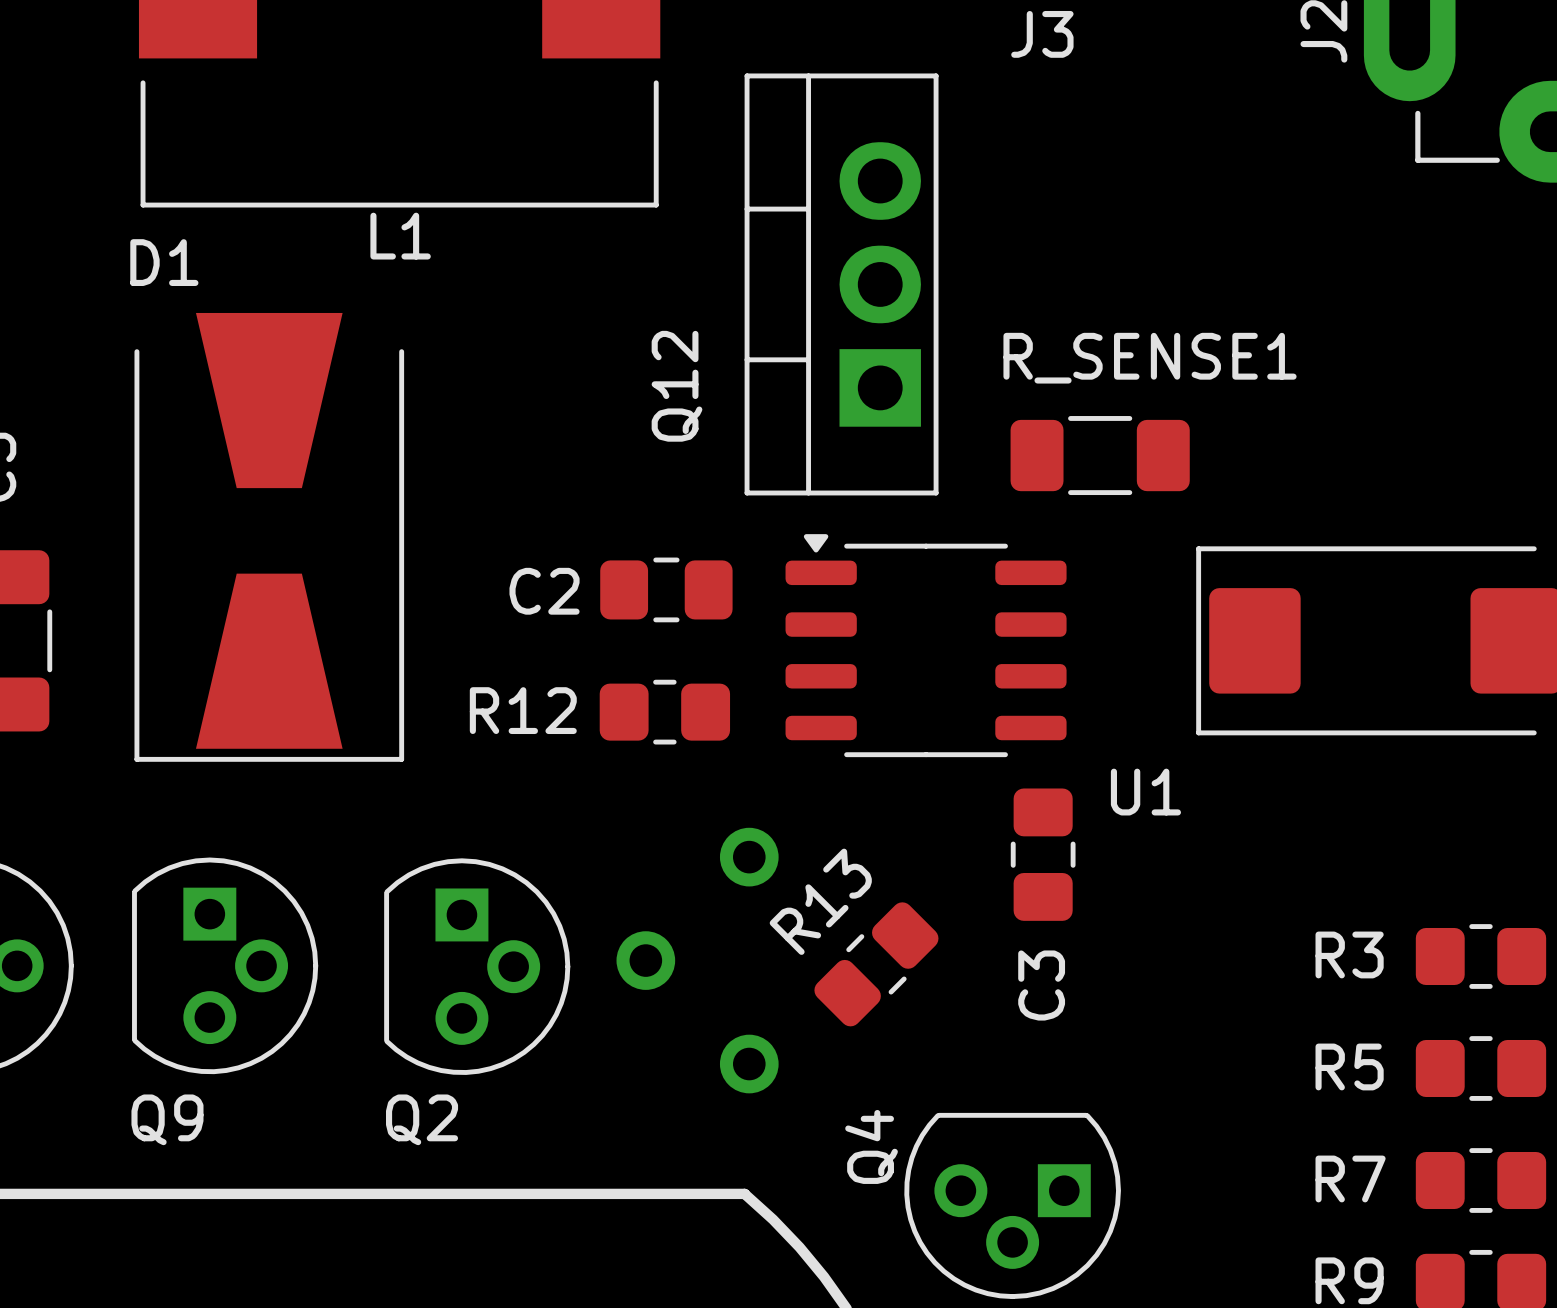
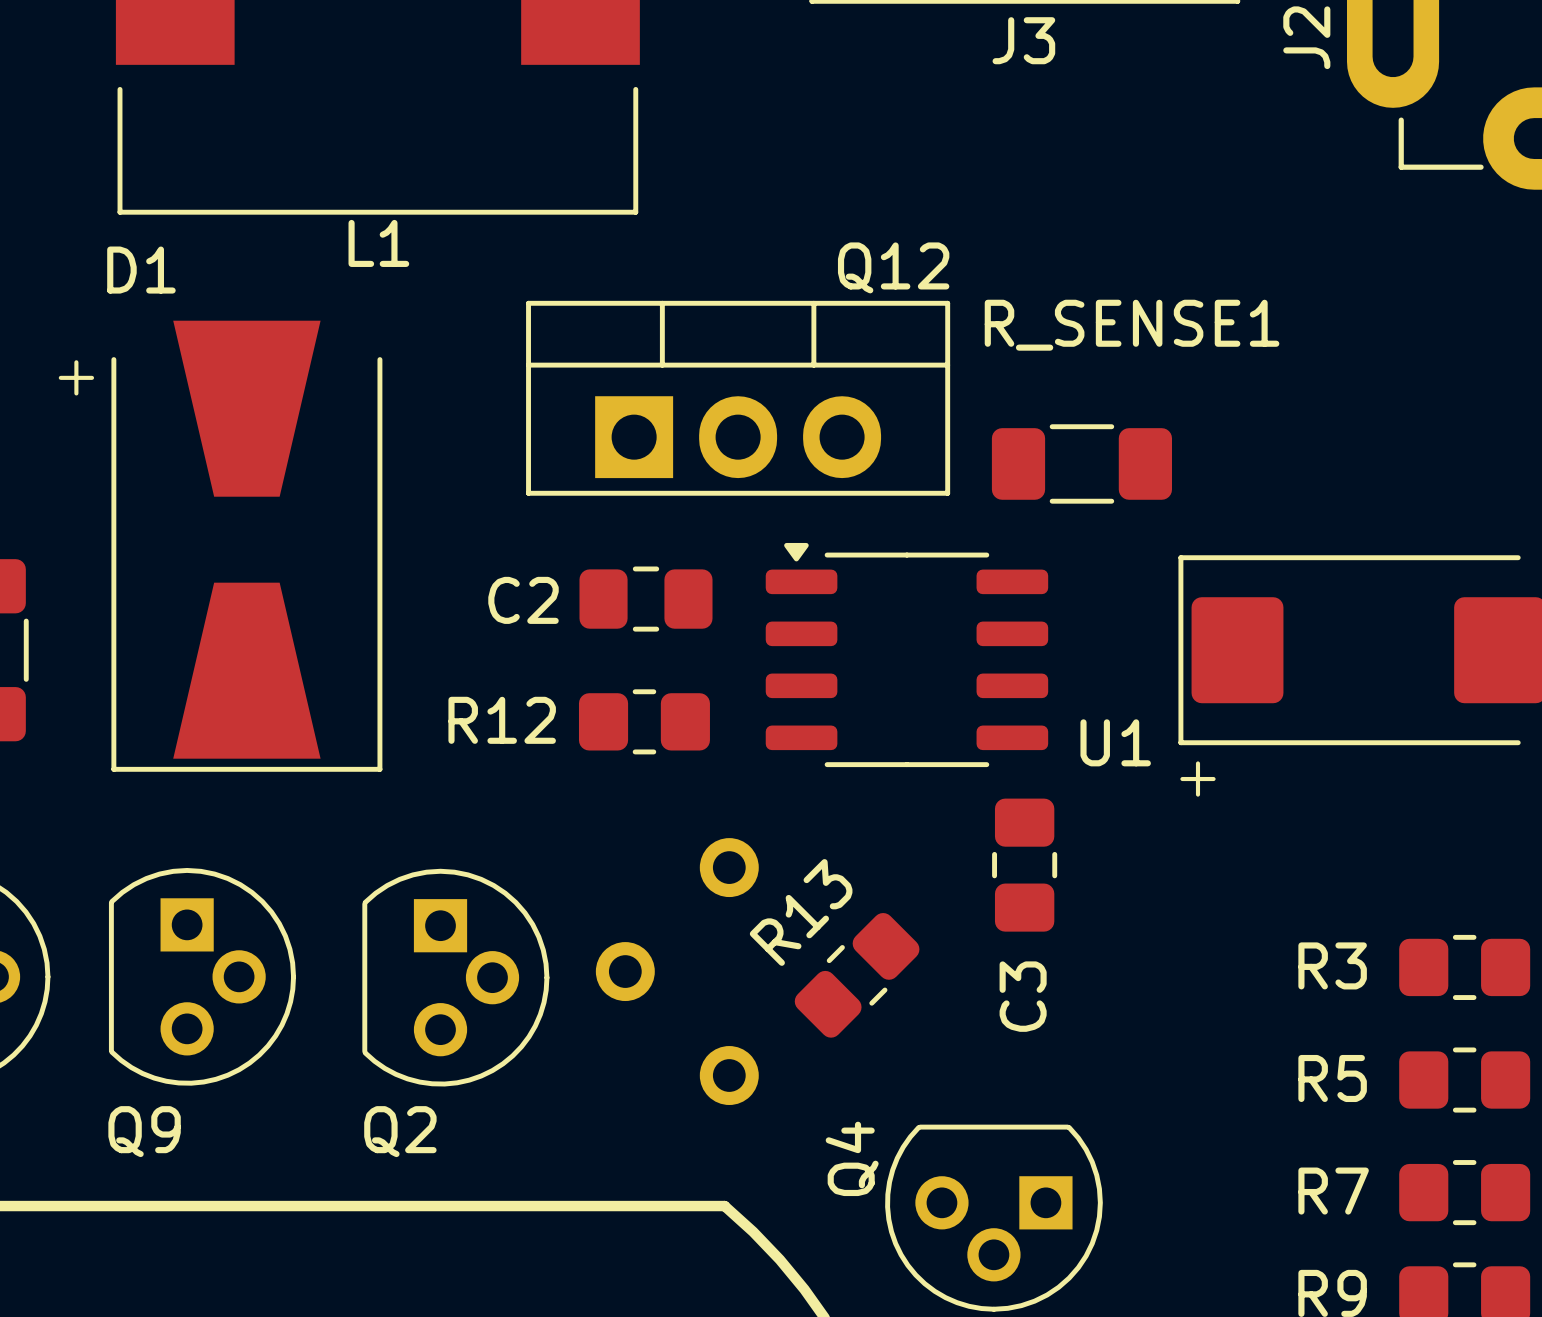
Q12 rotation: 0° (841, 284) -> 90° clockwise (738, 398)
R_SENSE1 name position: R_SENSE1 (1150, 358) -> R_SENSE1 (1132, 325)
text: none -> + (76, 377)
Q12 name position: Q12 (677, 386) -> Q12 (893, 267)
text: none -> + (1197, 779)
U1 name position: U1 (1145, 792) -> U1 (1115, 742)

